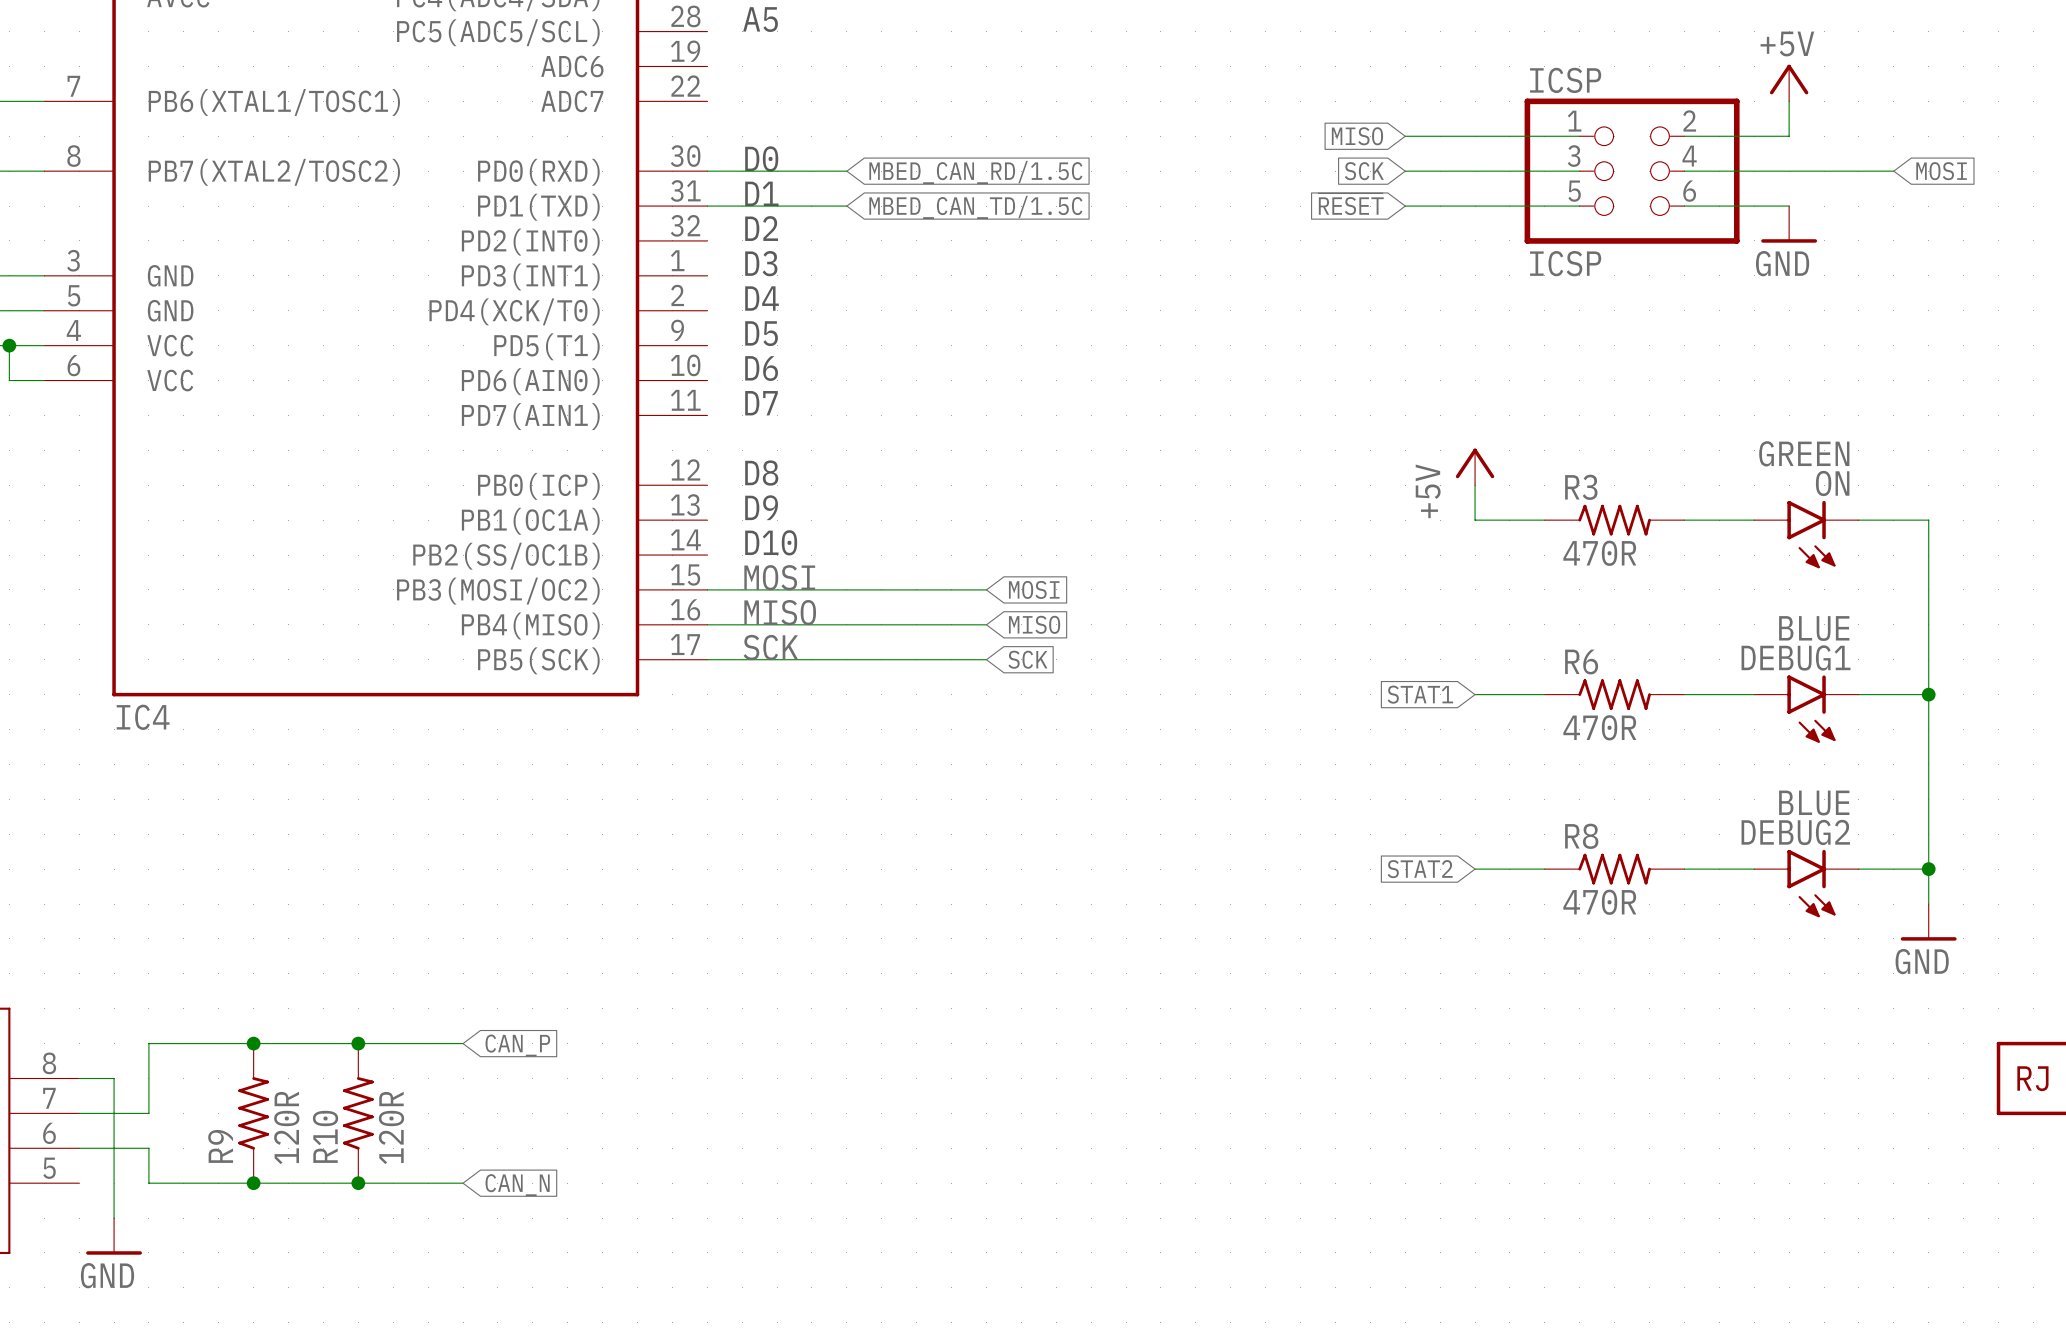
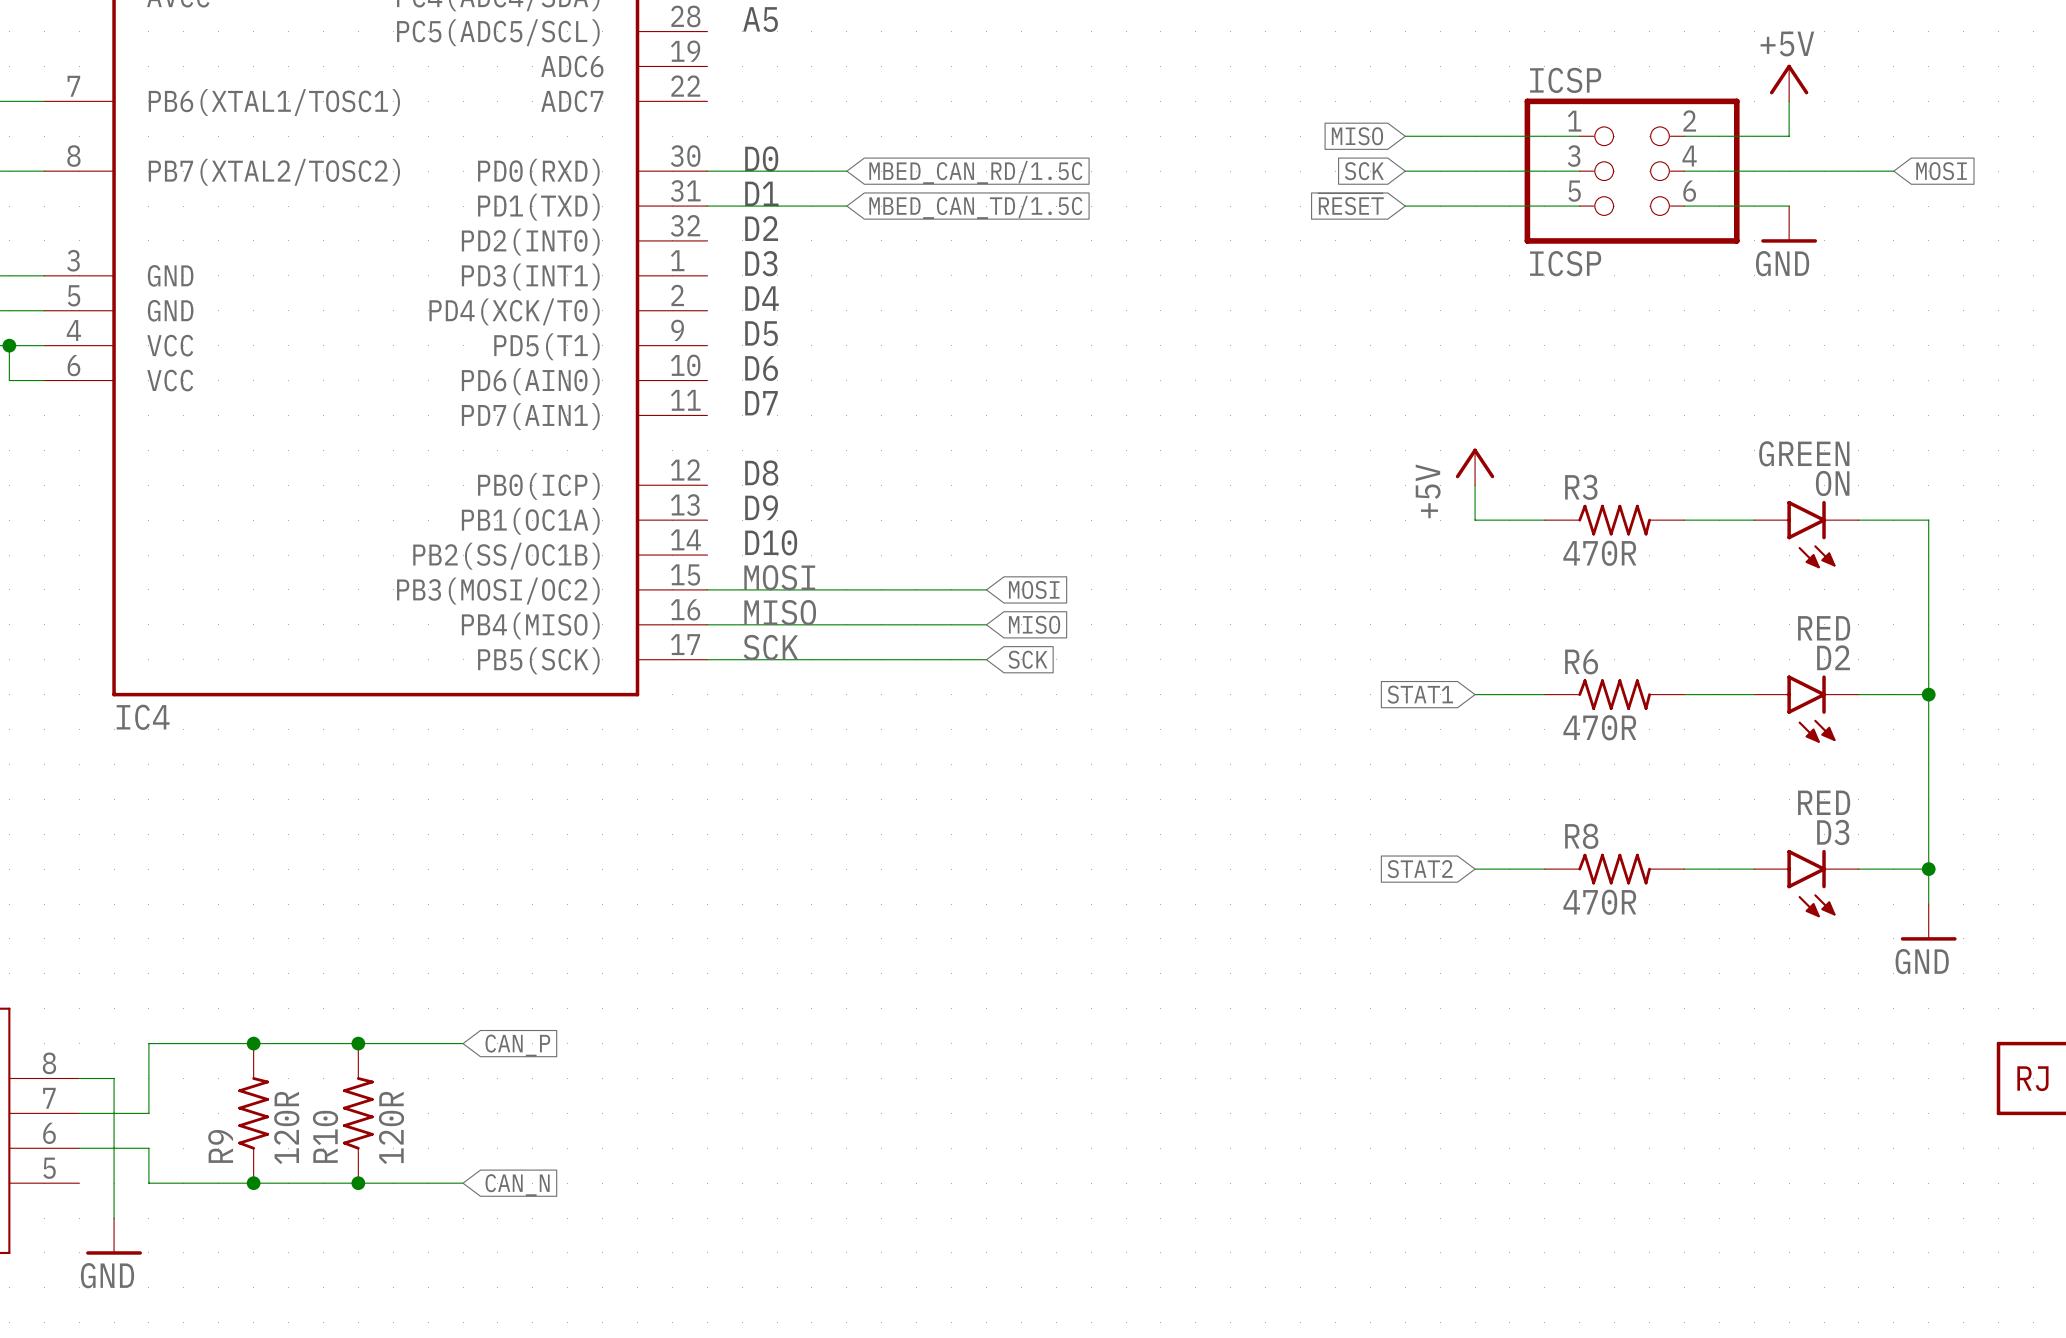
DEBUG1 value: BLUE (1814, 628) -> RED (1824, 628)
DEBUG1 name: DEBUG1 (1796, 657) -> D2 (1833, 657)
DEBUG2 value: BLUE (1814, 803) -> RED (1824, 802)
DEBUG2 name: DEBUG2 (1795, 832) -> D3 (1833, 832)

